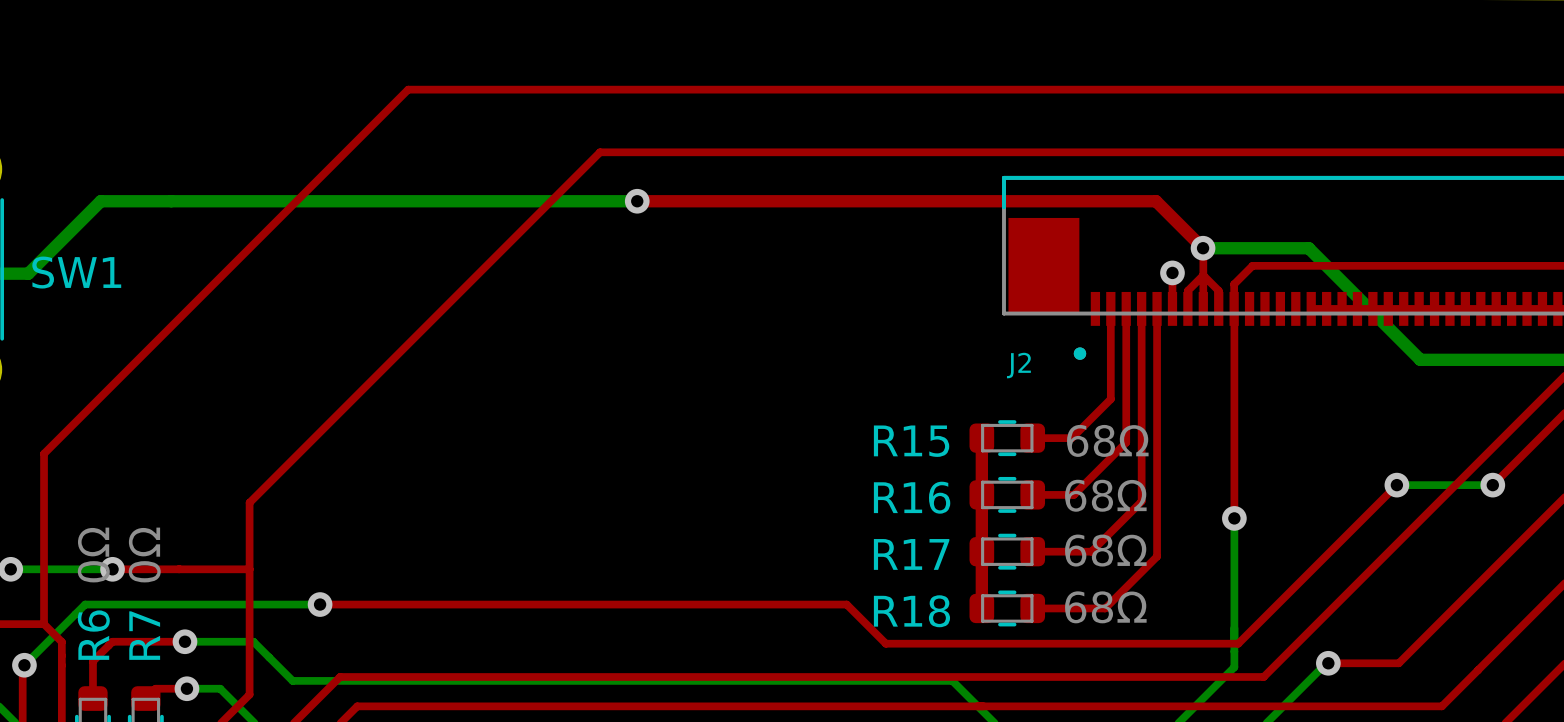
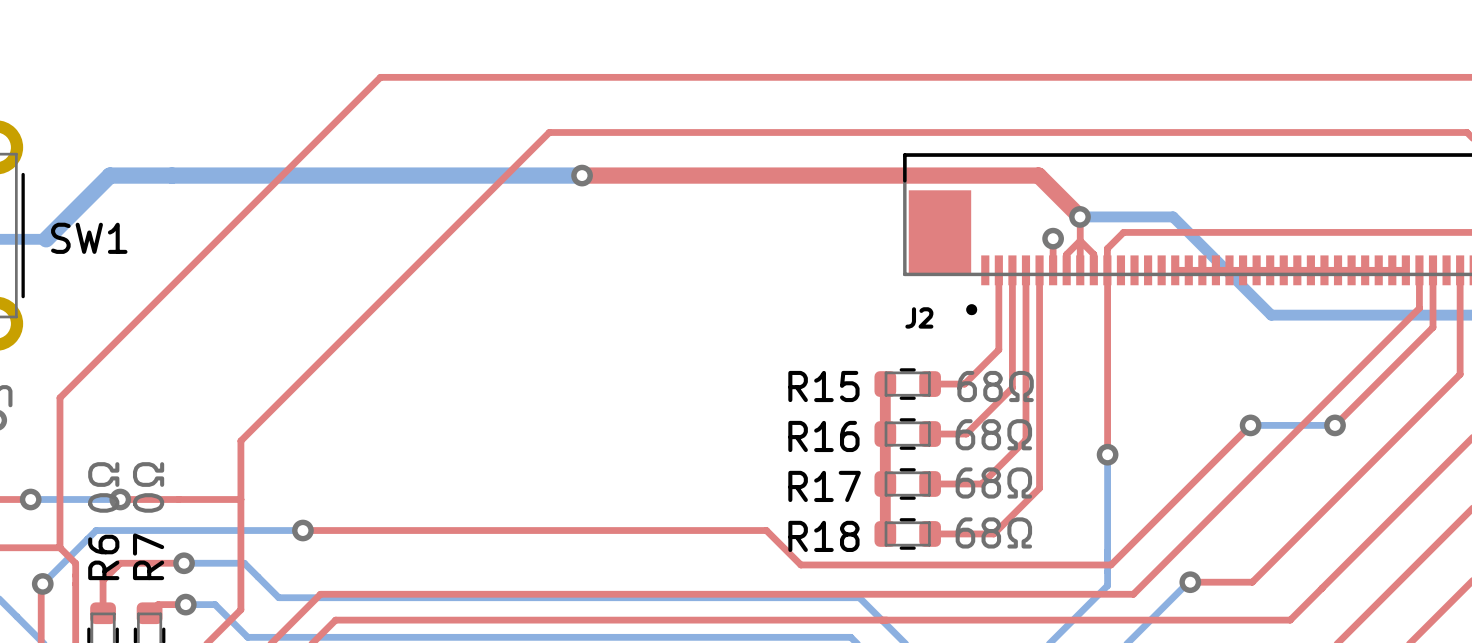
top track width: thin (637, 201) (1156, 201) (1203, 248) -> thick (582, 175) (1038, 175) (1080, 216)
bottom track width: thin (637, 201) (100, 201) (28, 273) -> thick (582, 175) (109, 175) (46, 239)

